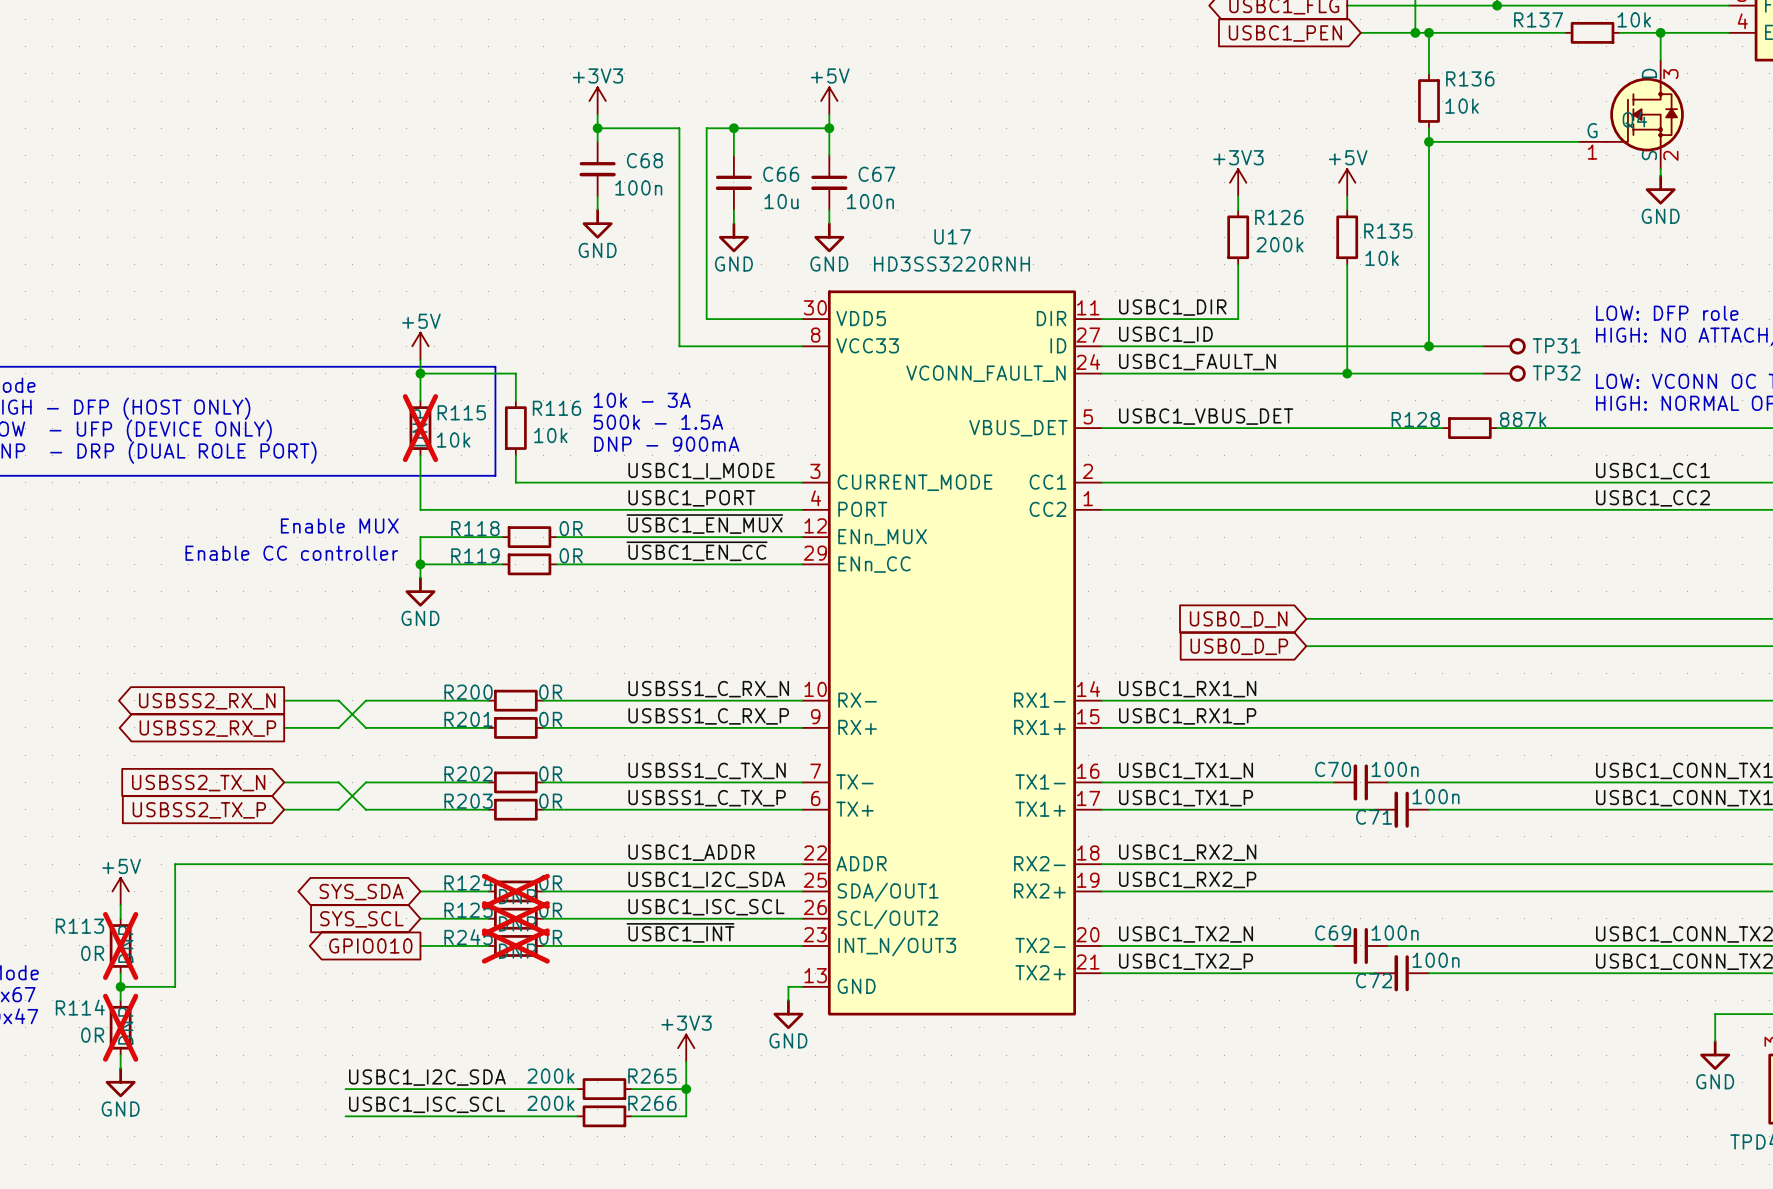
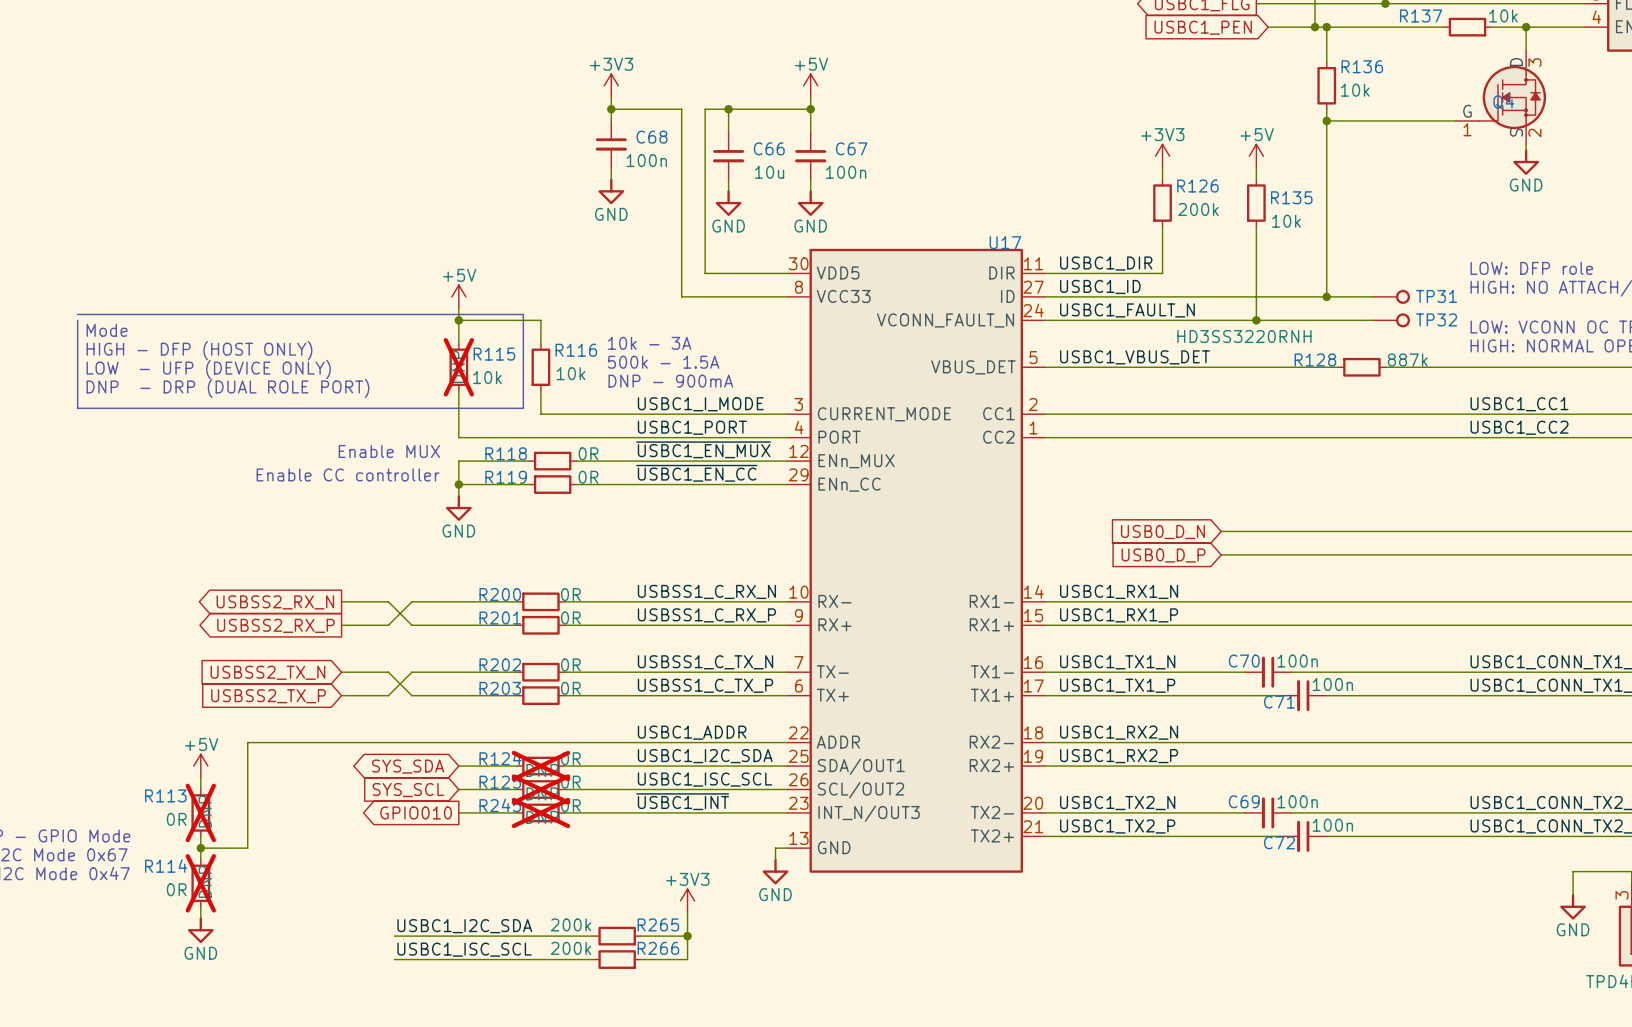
U17 name position: U17 (952, 236) -> U17 (1005, 242)
U17 value position: HD3SS3220RNH (951, 264) -> HD3SS3220RNH (1244, 336)

